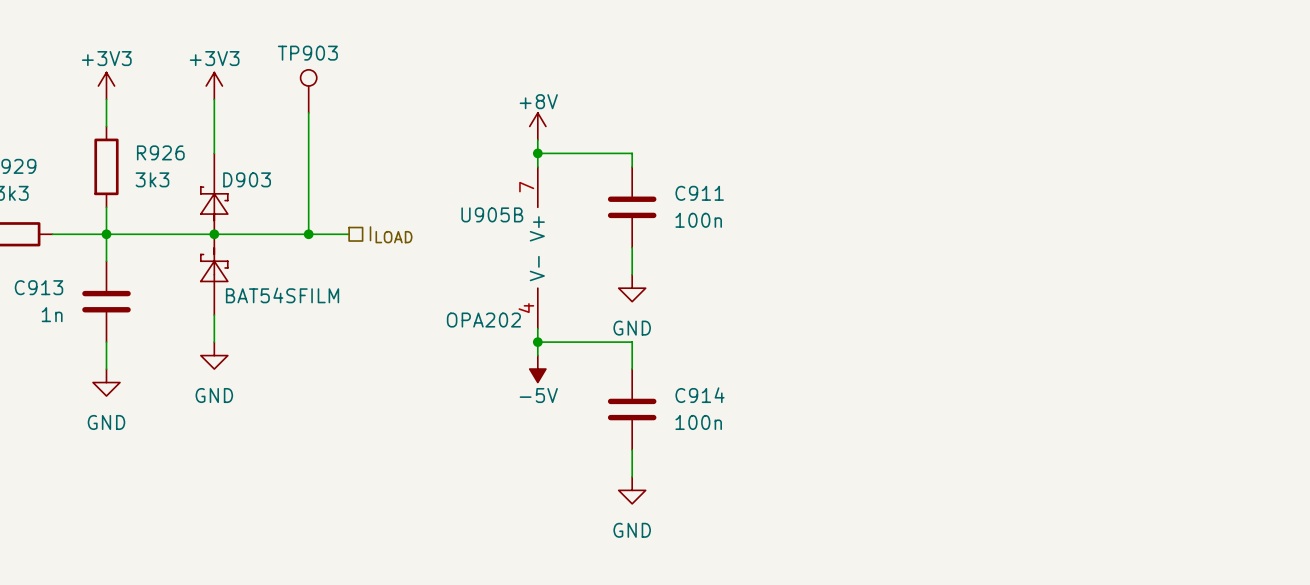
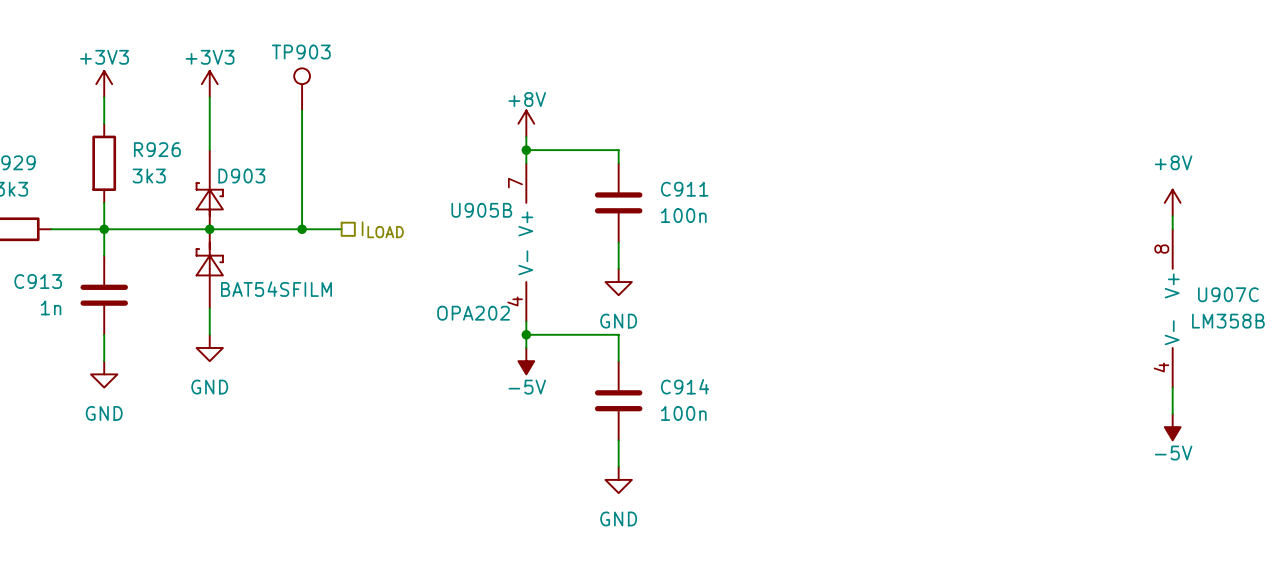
power symbol: none -> +8V (1172, 202)
wire: none -> (1172, 216) (1172, 229)
U907C: none -> LM358B (1172, 308)
wire: none -> (1172, 387) (1172, 413)
power symbol: none -> -5V (1172, 427)

